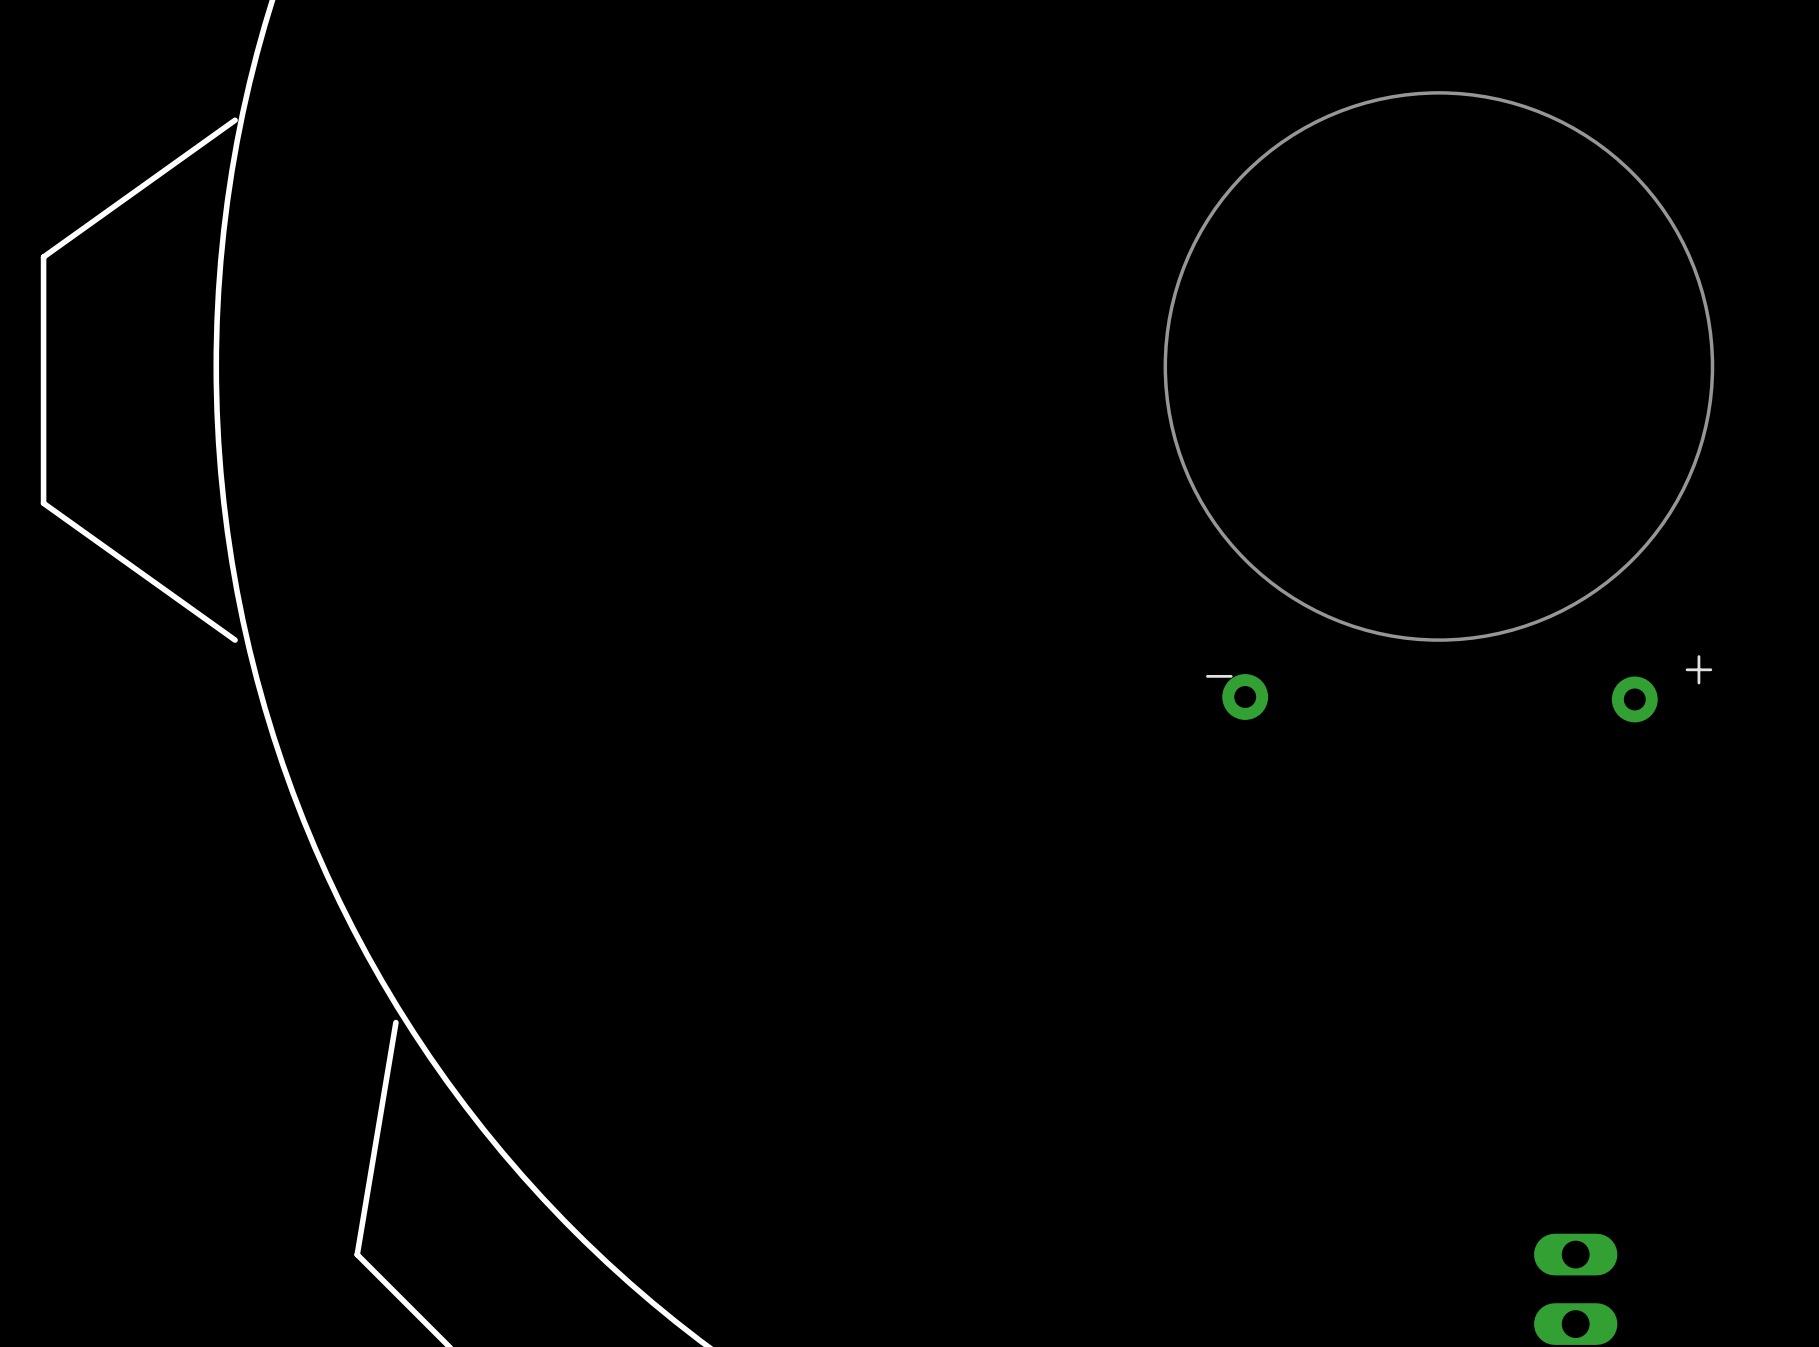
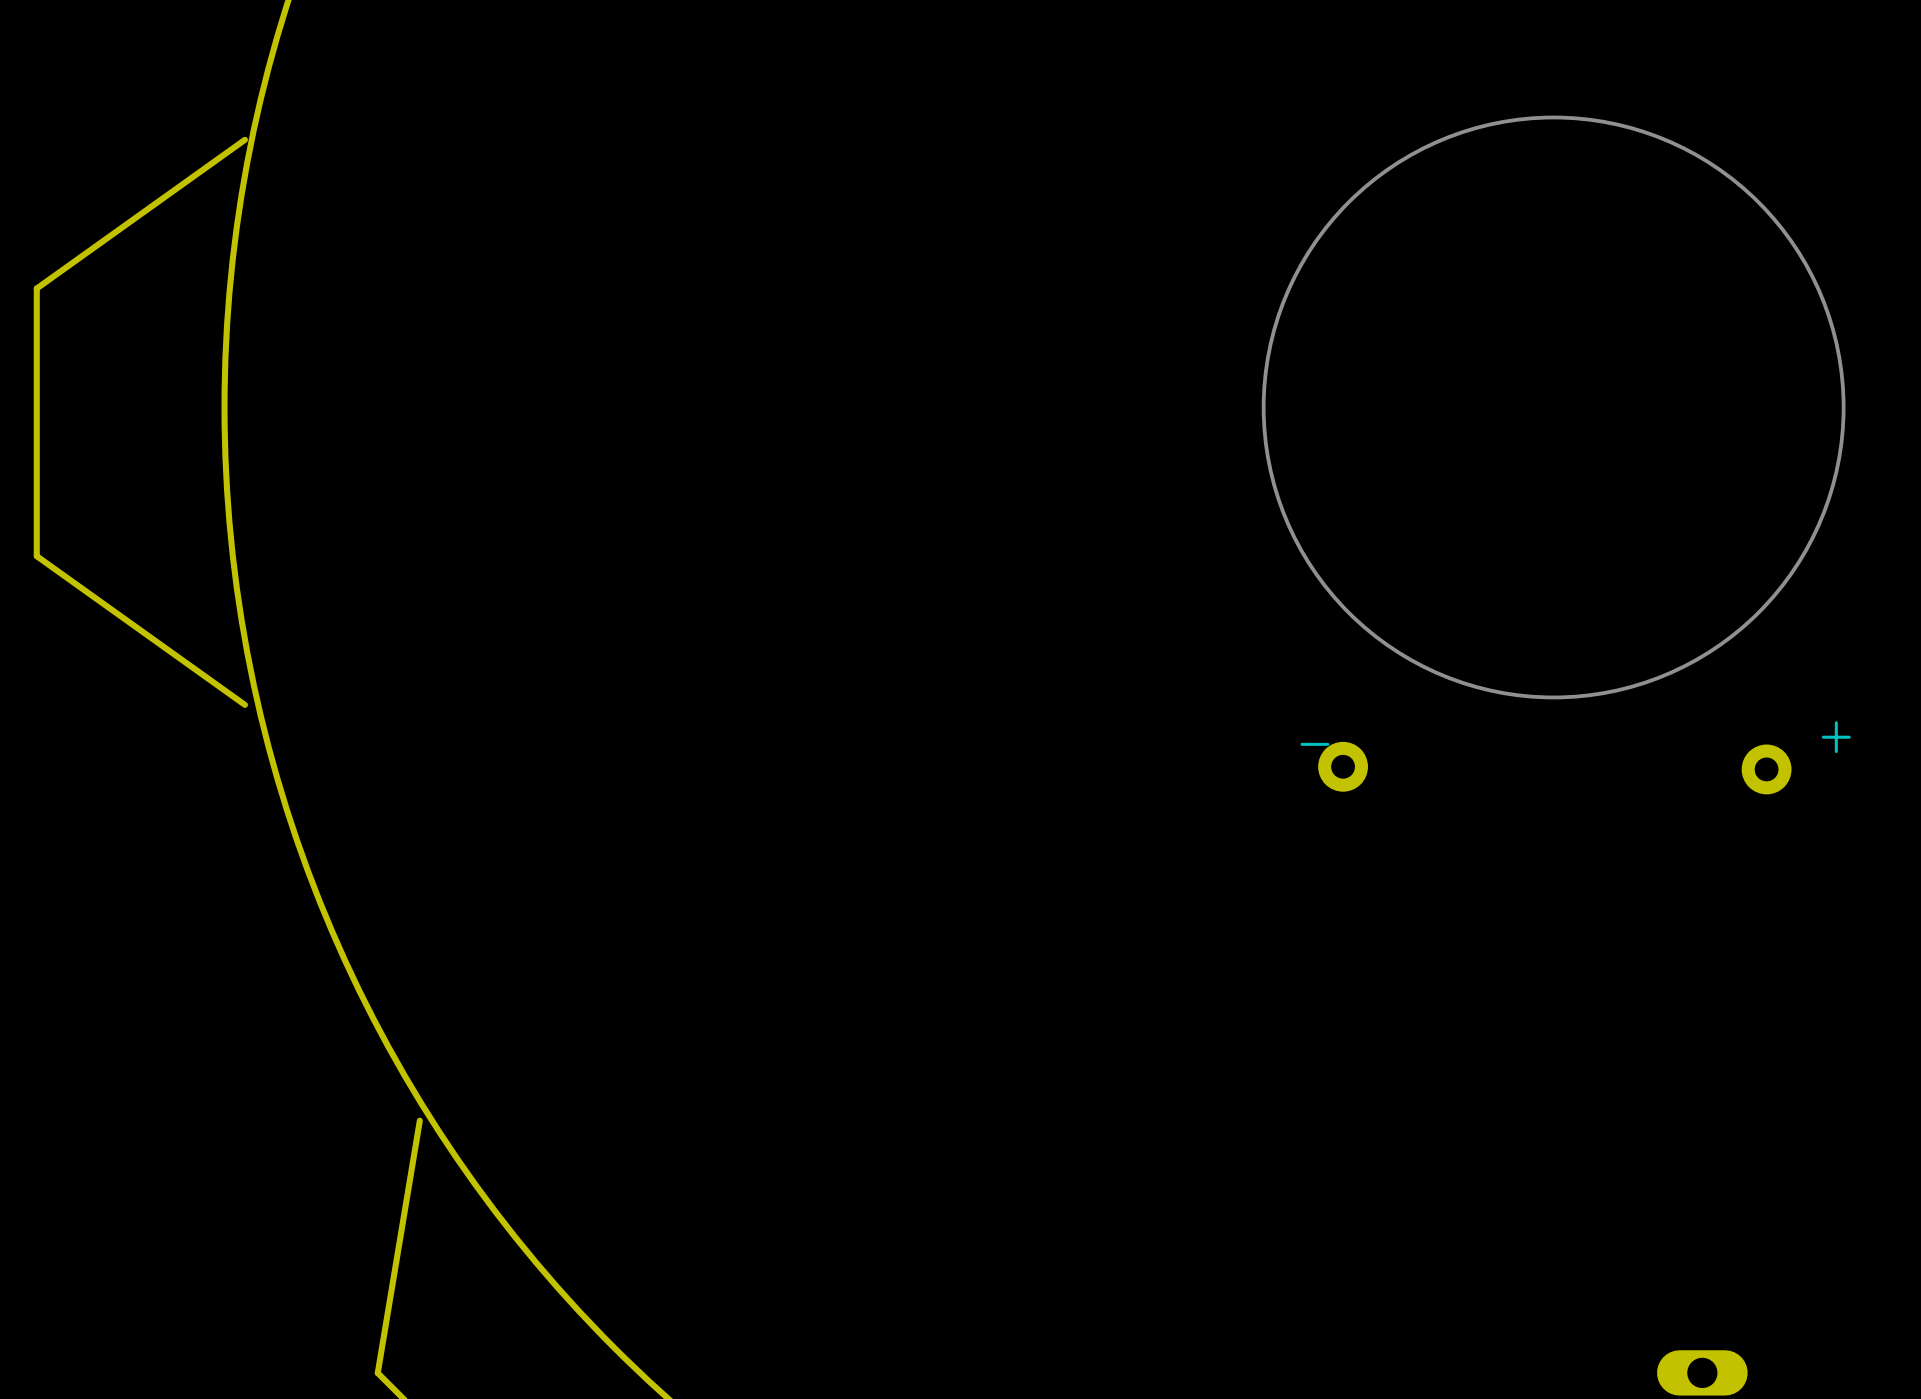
part footprint: [1163, 91, 1715, 723] -> [1261, 115, 1846, 795]

